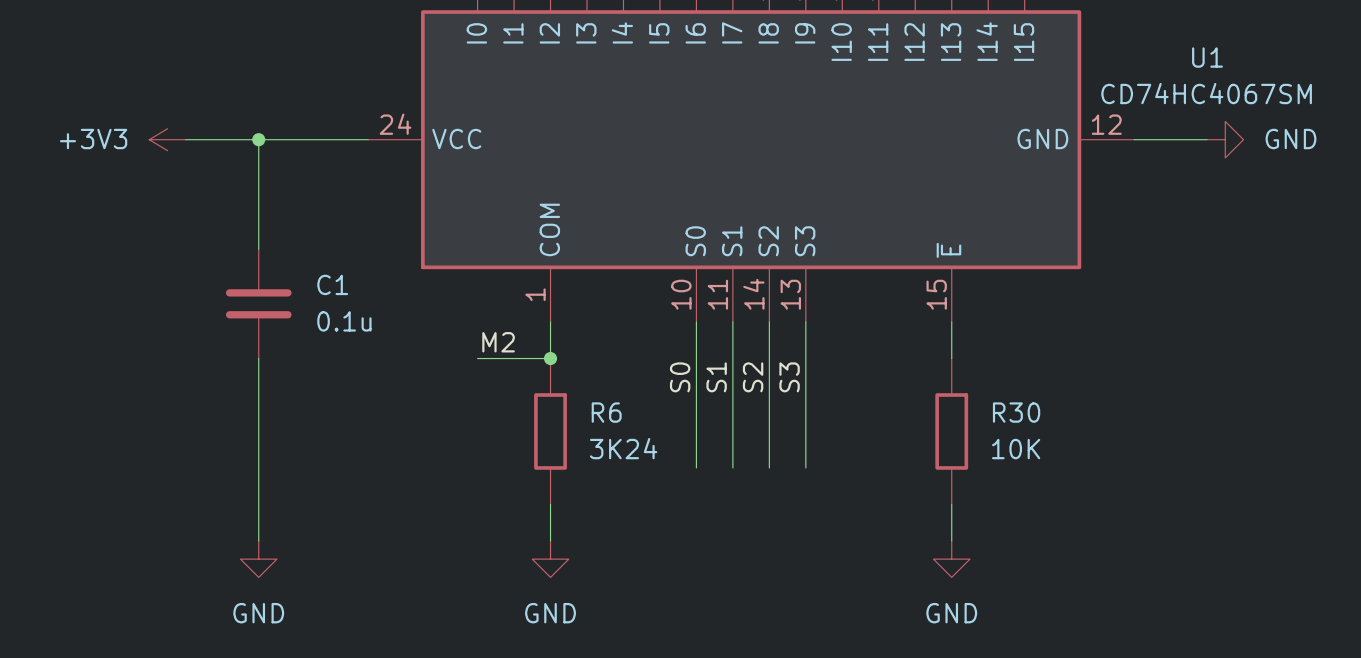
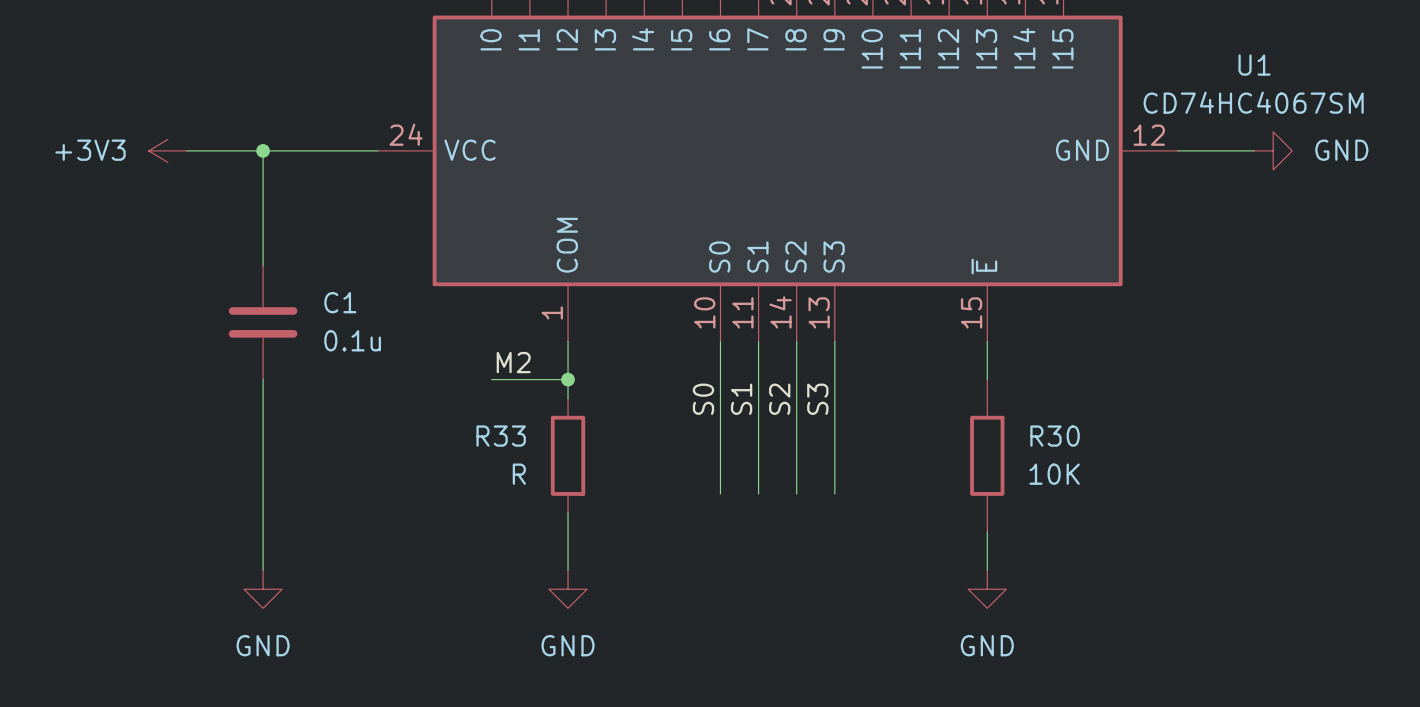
R6: 3K24 (550, 431) -> none
R33: none -> R (568, 455)

